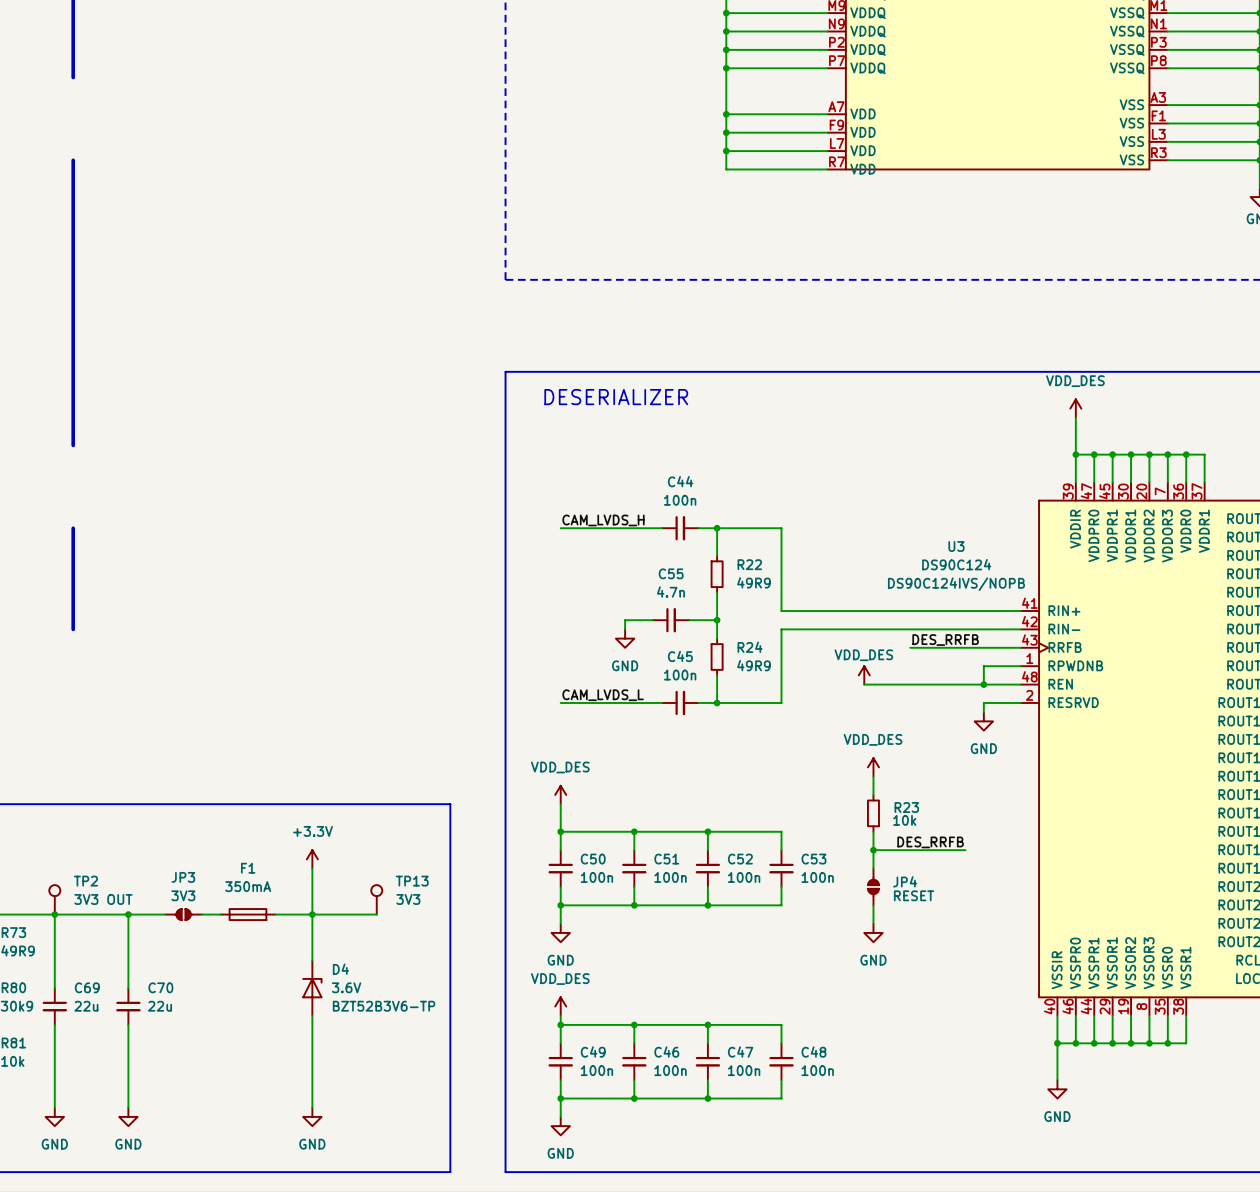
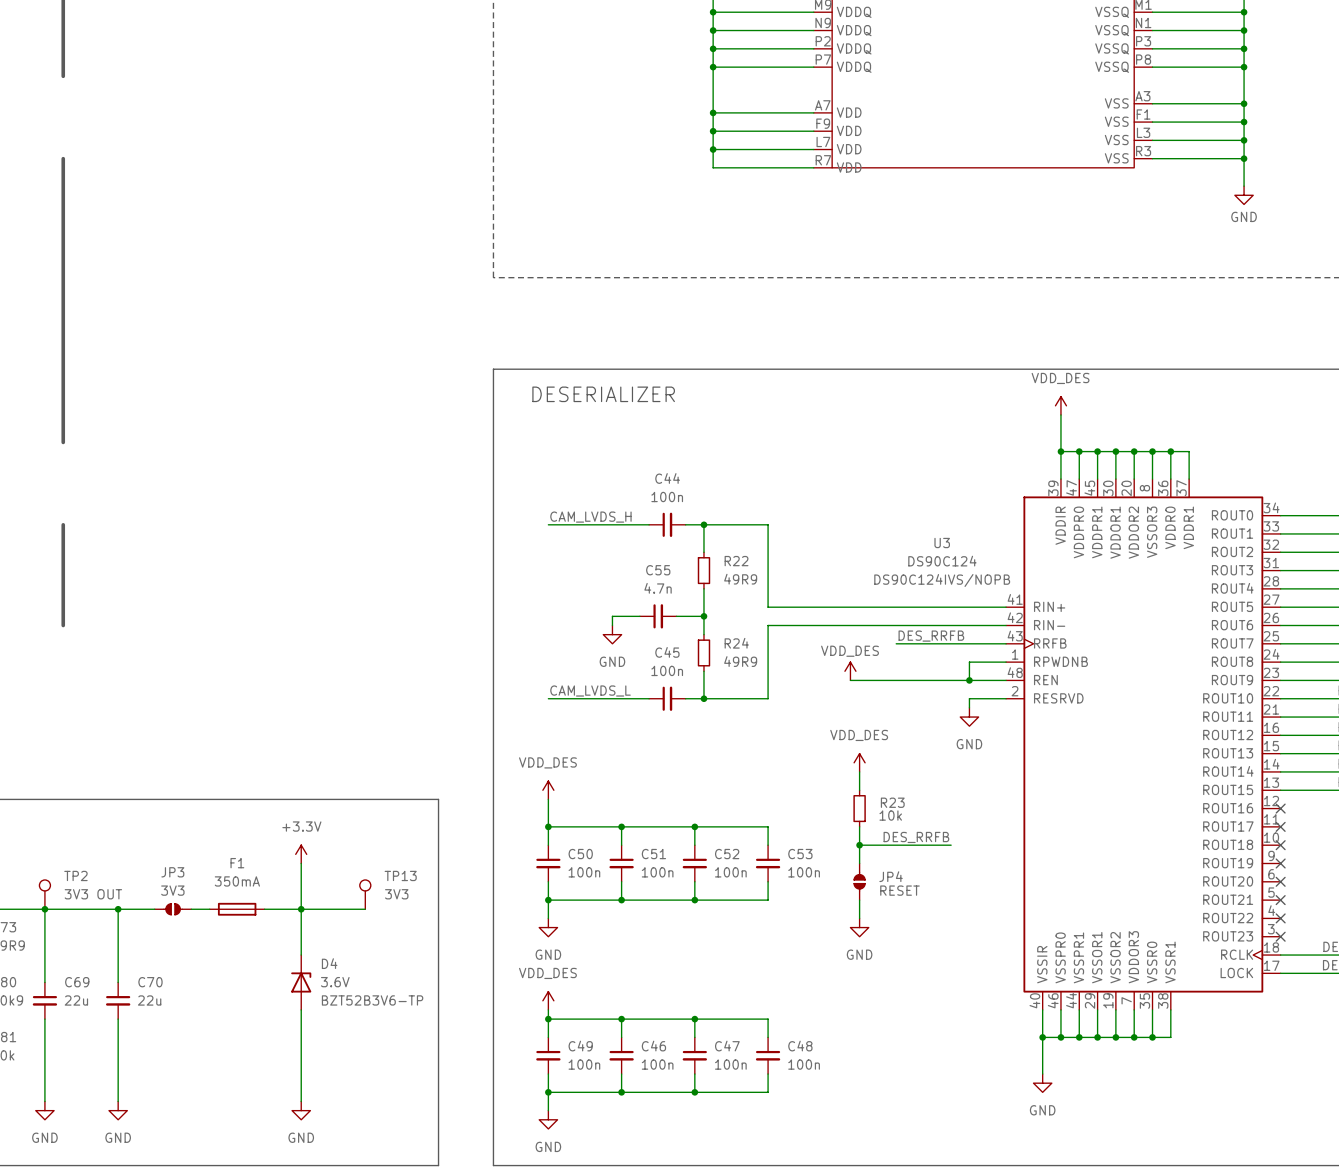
U3 pin number: 7 (1160, 491) -> 8 (1144, 488)
U3 pin name: VDDOR3 (1167, 536) -> VSSOR3 (1152, 532)
U3 pin name: VSSOR3 (1149, 963) -> VDDOR3 (1133, 957)
U3 pin number: 8 (1141, 1006) -> 7 (1126, 1000)

